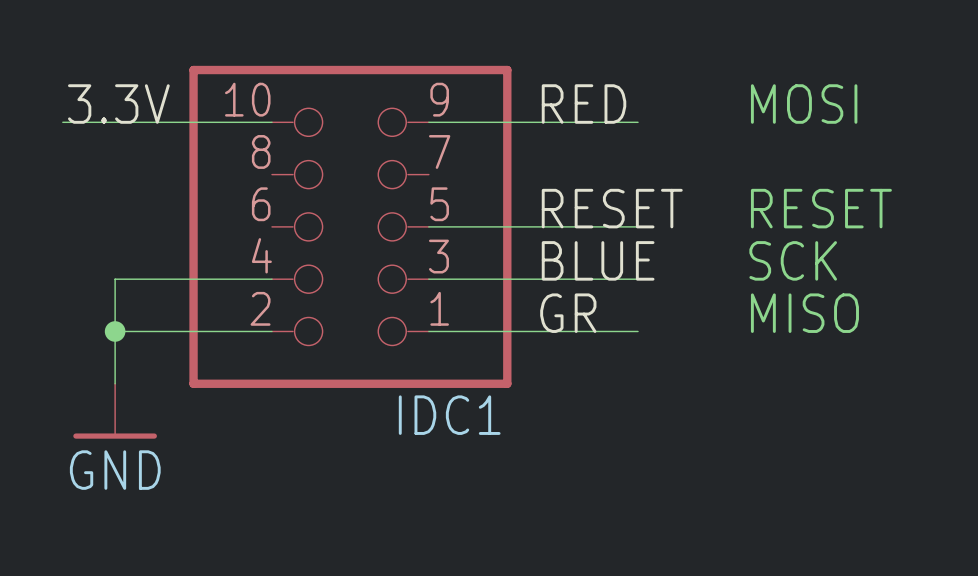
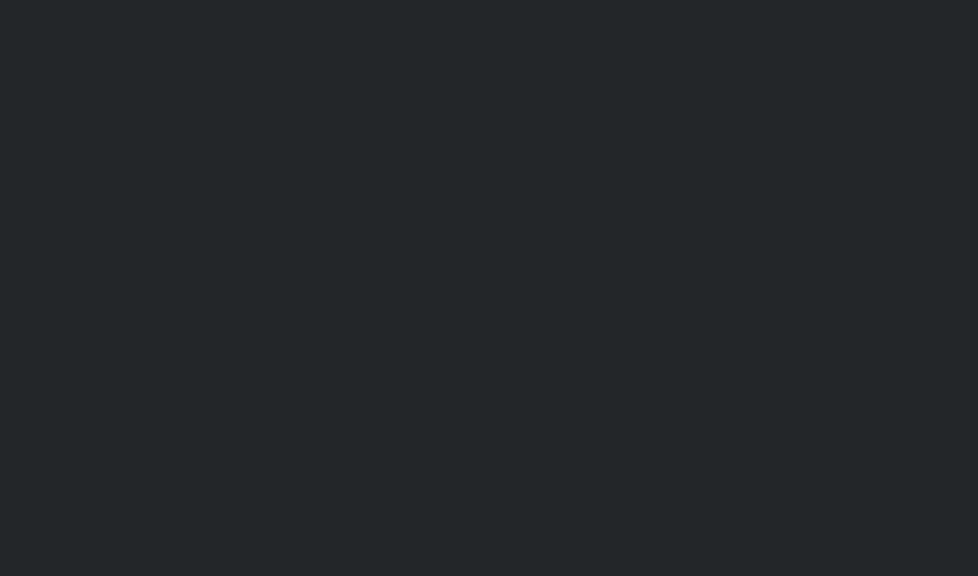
label: 3.3V (118, 104) -> none
label: RED (584, 104) -> none
text: MOSI (804, 104) -> none
wire: (62, 122) (271, 122) -> none
wire: (428, 122) (638, 122) -> none
label: RESET (612, 208) -> none
text: RESET (821, 208) -> none
IDC1: (350, 226) -> none
wire: (428, 226) (638, 226) -> none
label: BLUE (598, 260) -> none
text: SCK (793, 260) -> none
wire: (271, 279) (115, 279) (115, 383) -> none
wire: (428, 279) (638, 279) -> none
label: GR (568, 313) -> none
text: MISO (804, 313) -> none
wire: (115, 331) (271, 331) -> none
junction: (115, 331) -> none
wire: (428, 331) (638, 331) -> none
power symbol: GND (115, 411) -> none

